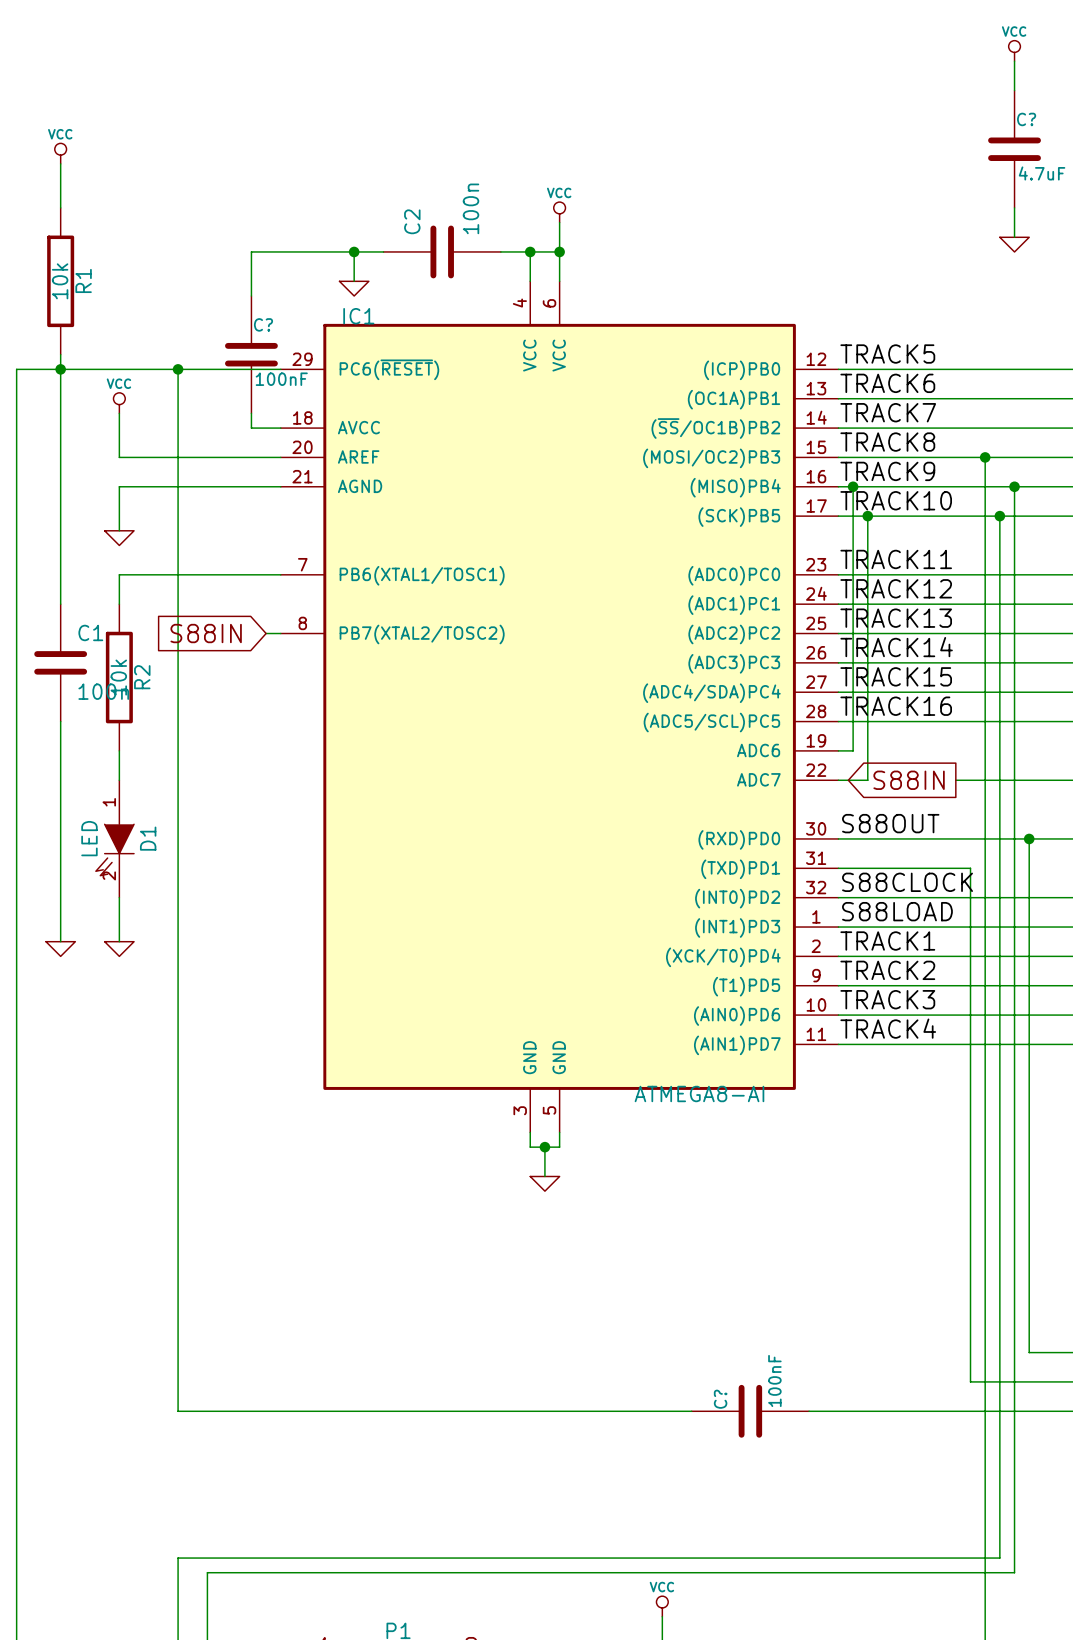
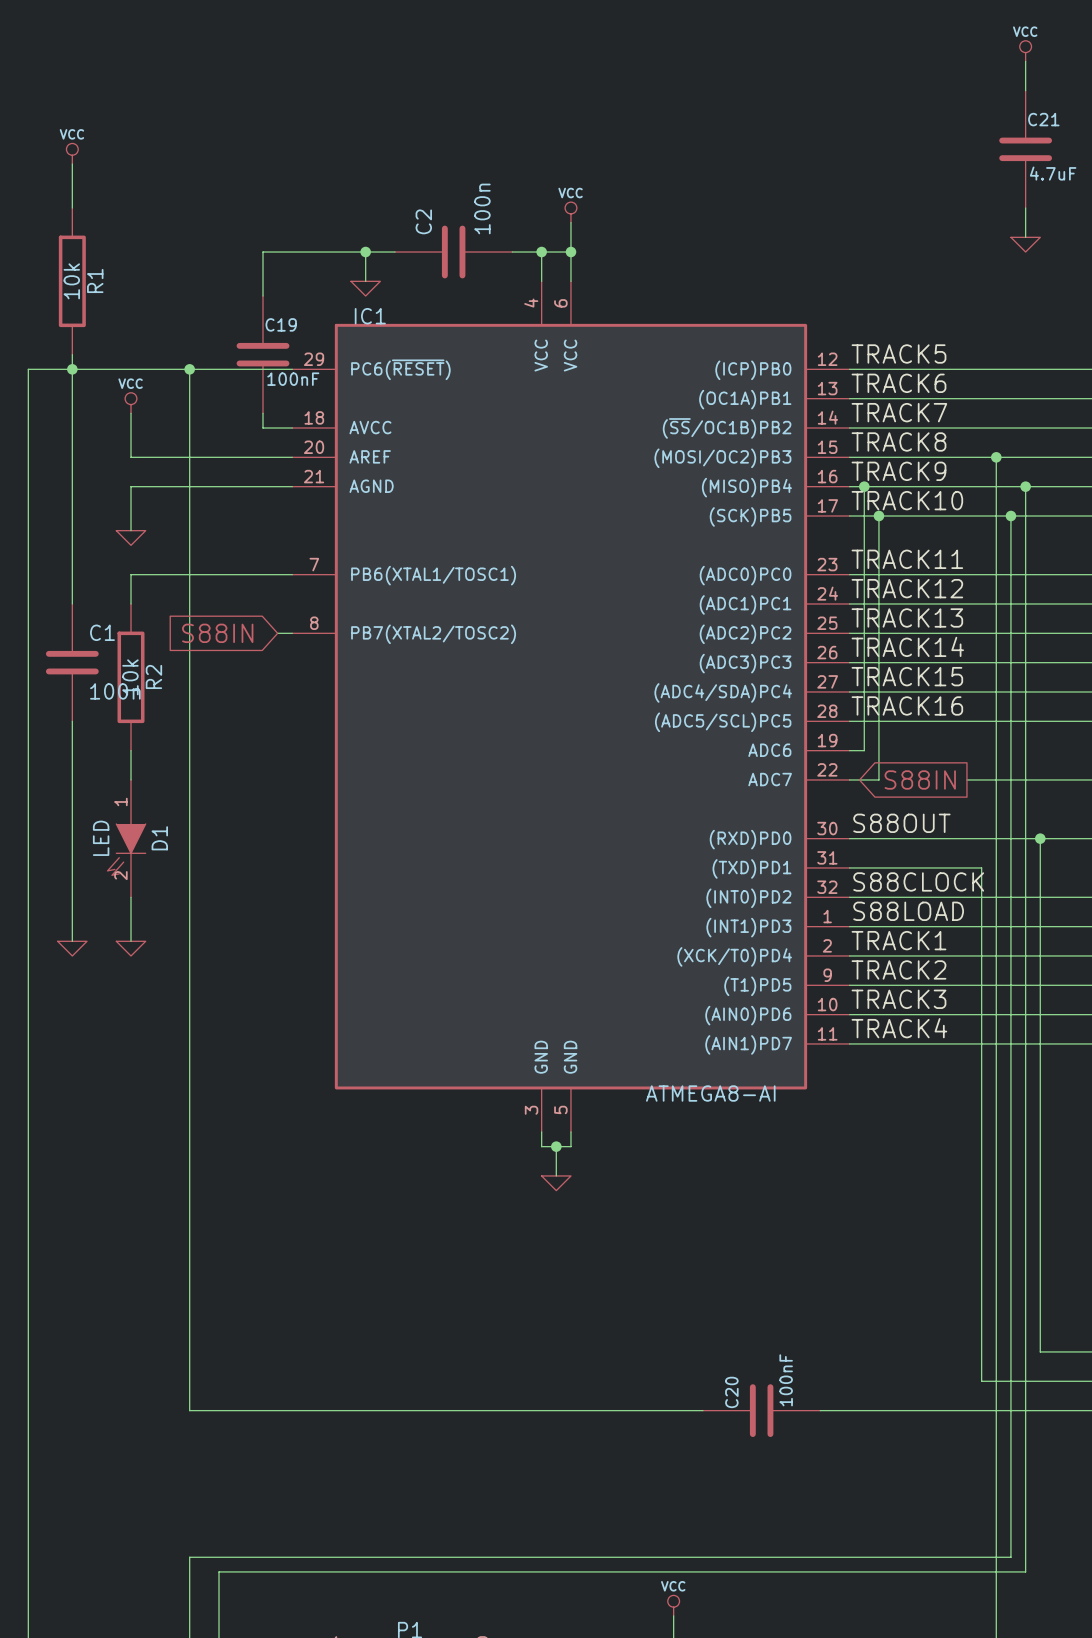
C? name: C? (1026, 119) -> C21 (1043, 119)
C? name: C? (263, 324) -> C19 (281, 324)
C? name: C? (720, 1399) -> C20 (731, 1392)

